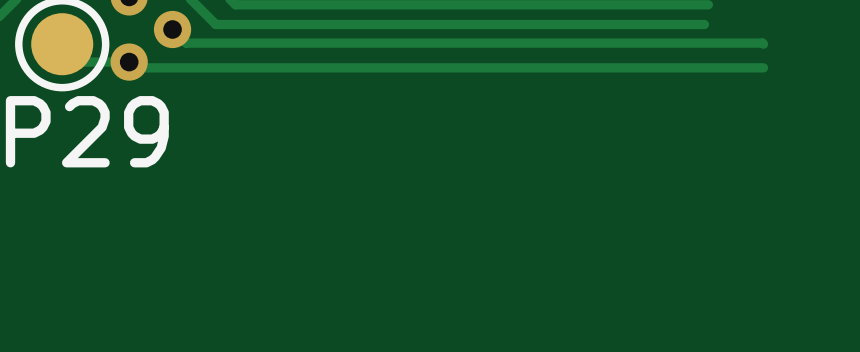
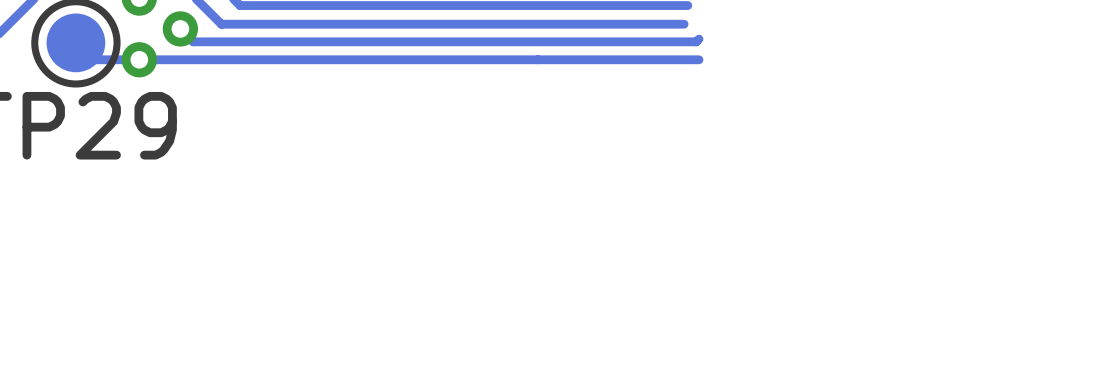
track: (717, 43) (763, 44) -> (696, 41) (699, 39)
track: (129, 62) (134, 67) (763, 67) -> (139, 59) (699, 59)

